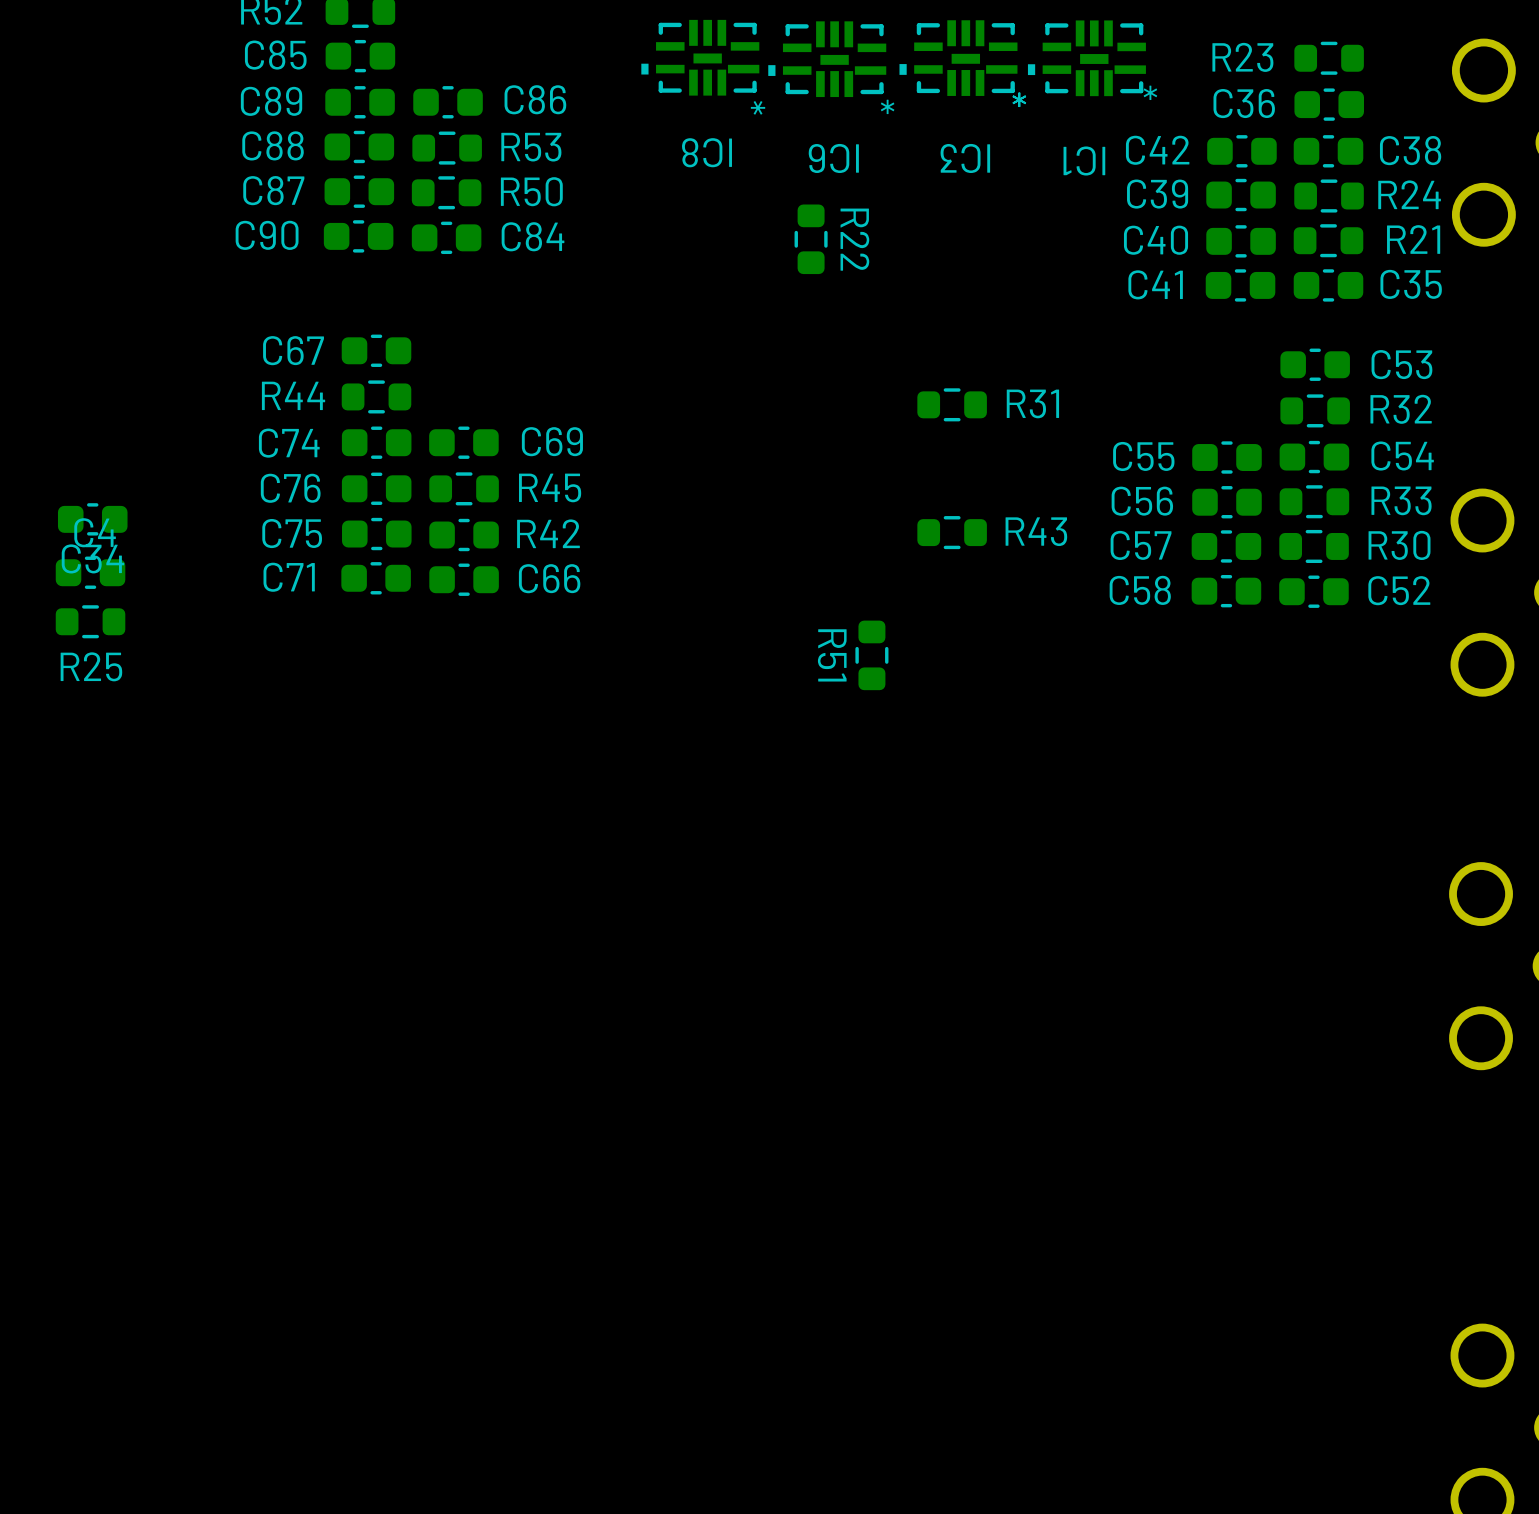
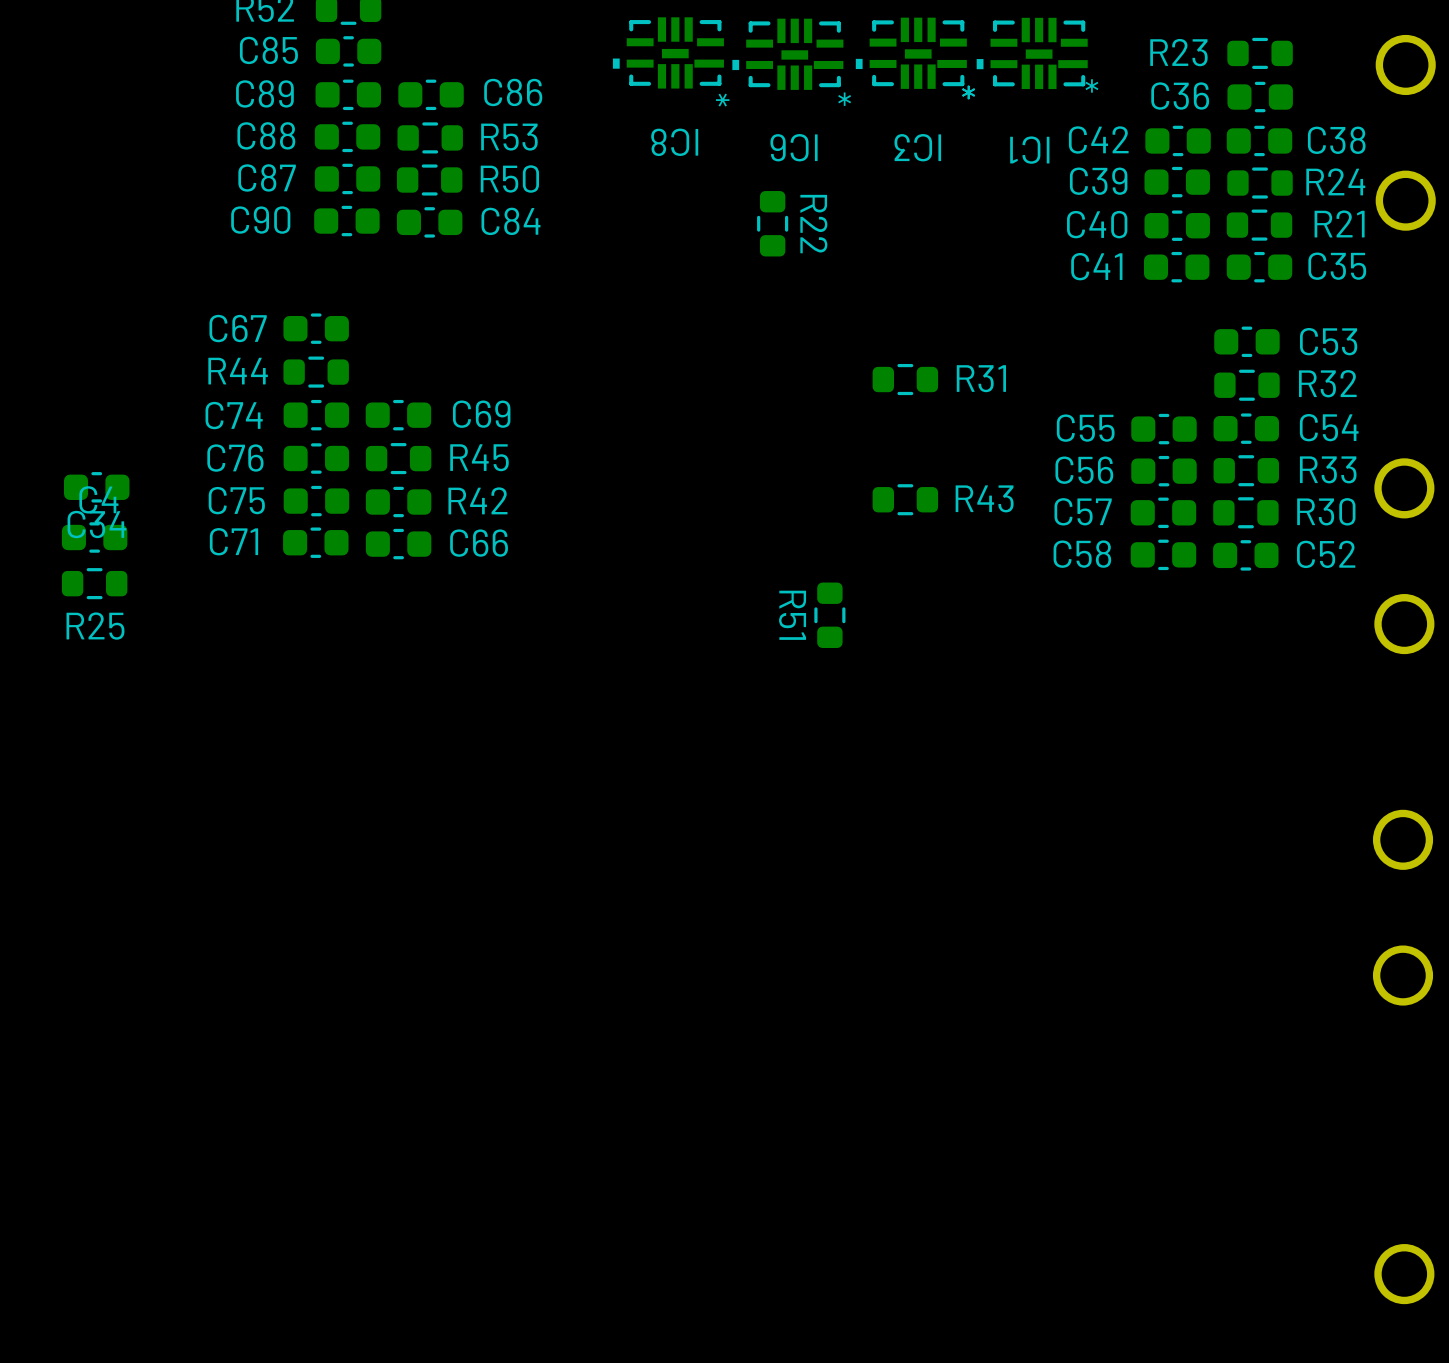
C67 position: (376, 350) -> (316, 328)
R44 position: (376, 396) -> (316, 372)
C74 position: (376, 442) -> (316, 415)
C69 position: (463, 442) -> (398, 415)
C76 position: (376, 488) -> (316, 458)
R45 position: (464, 488) -> (398, 458)
C75 position: (376, 534) -> (316, 501)
R42 position: (464, 535) -> (398, 502)
C71 position: (376, 578) -> (315, 542)
C66 position: (464, 579) -> (398, 544)

